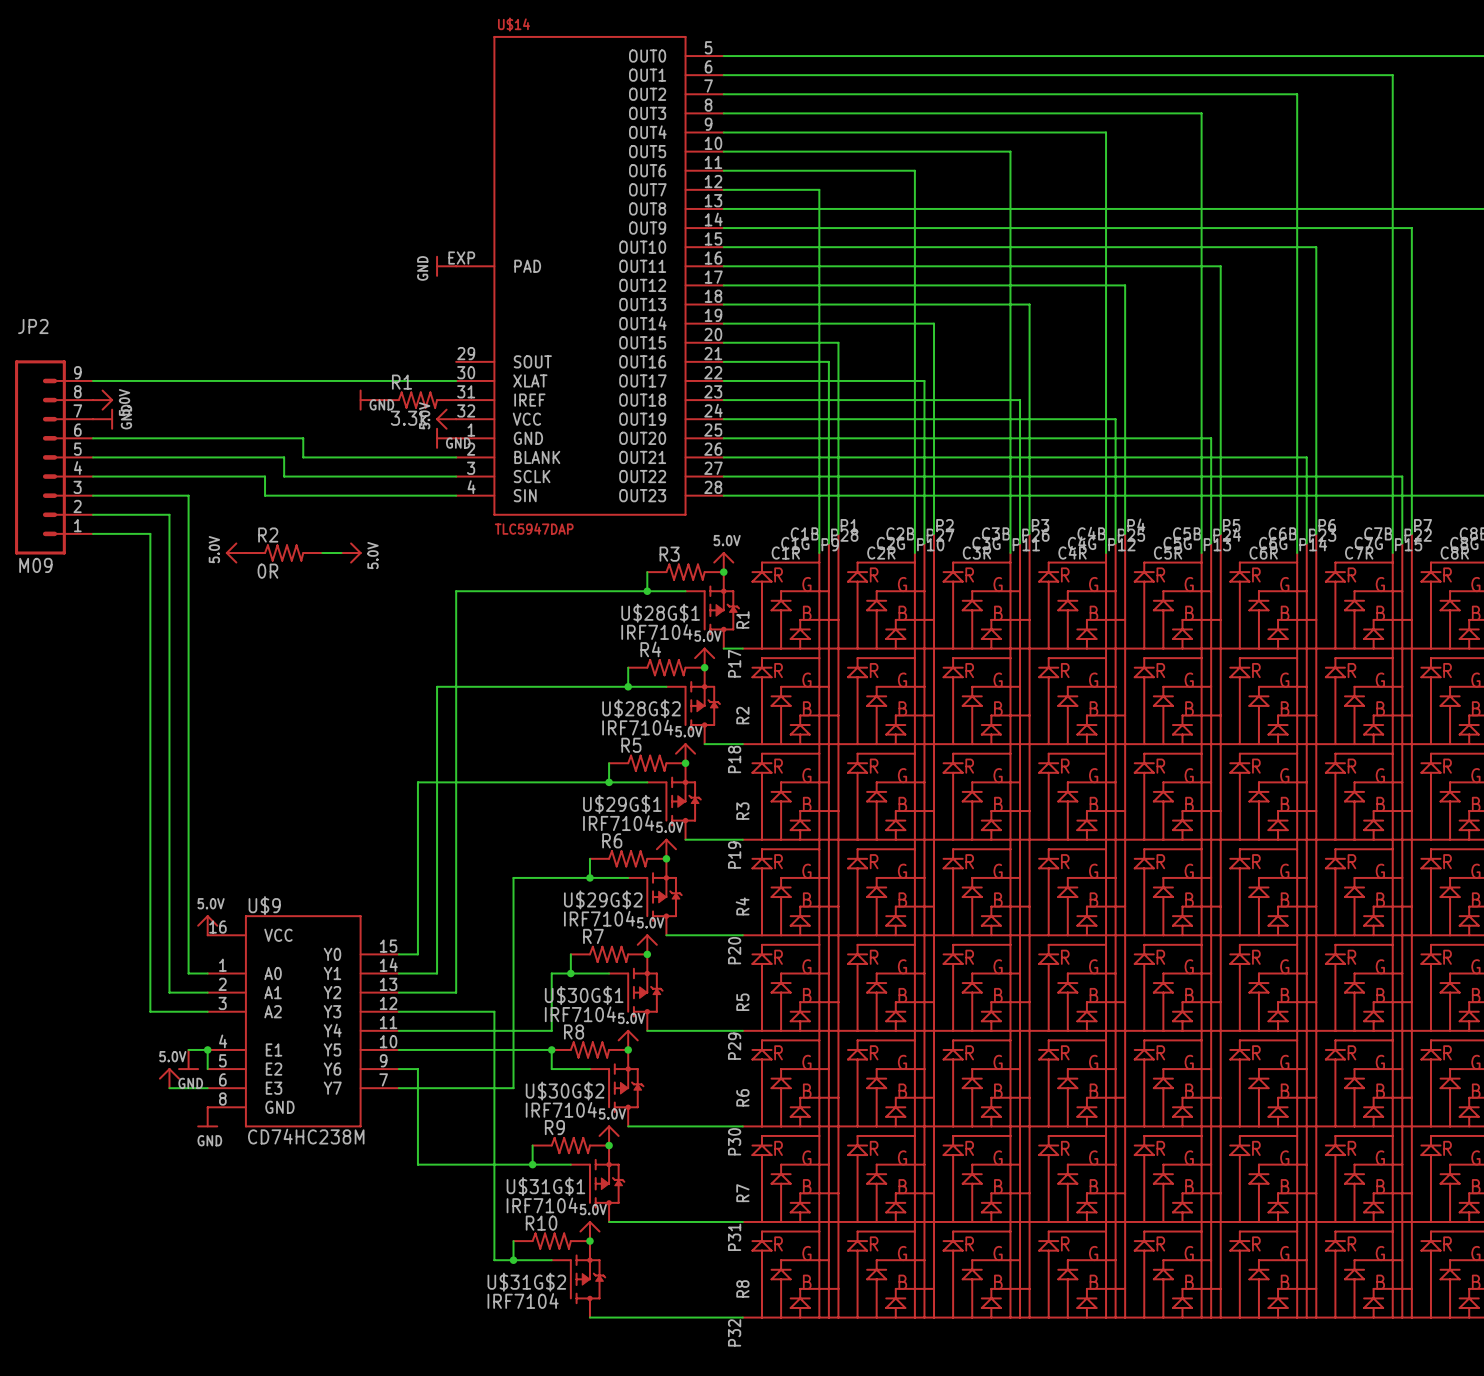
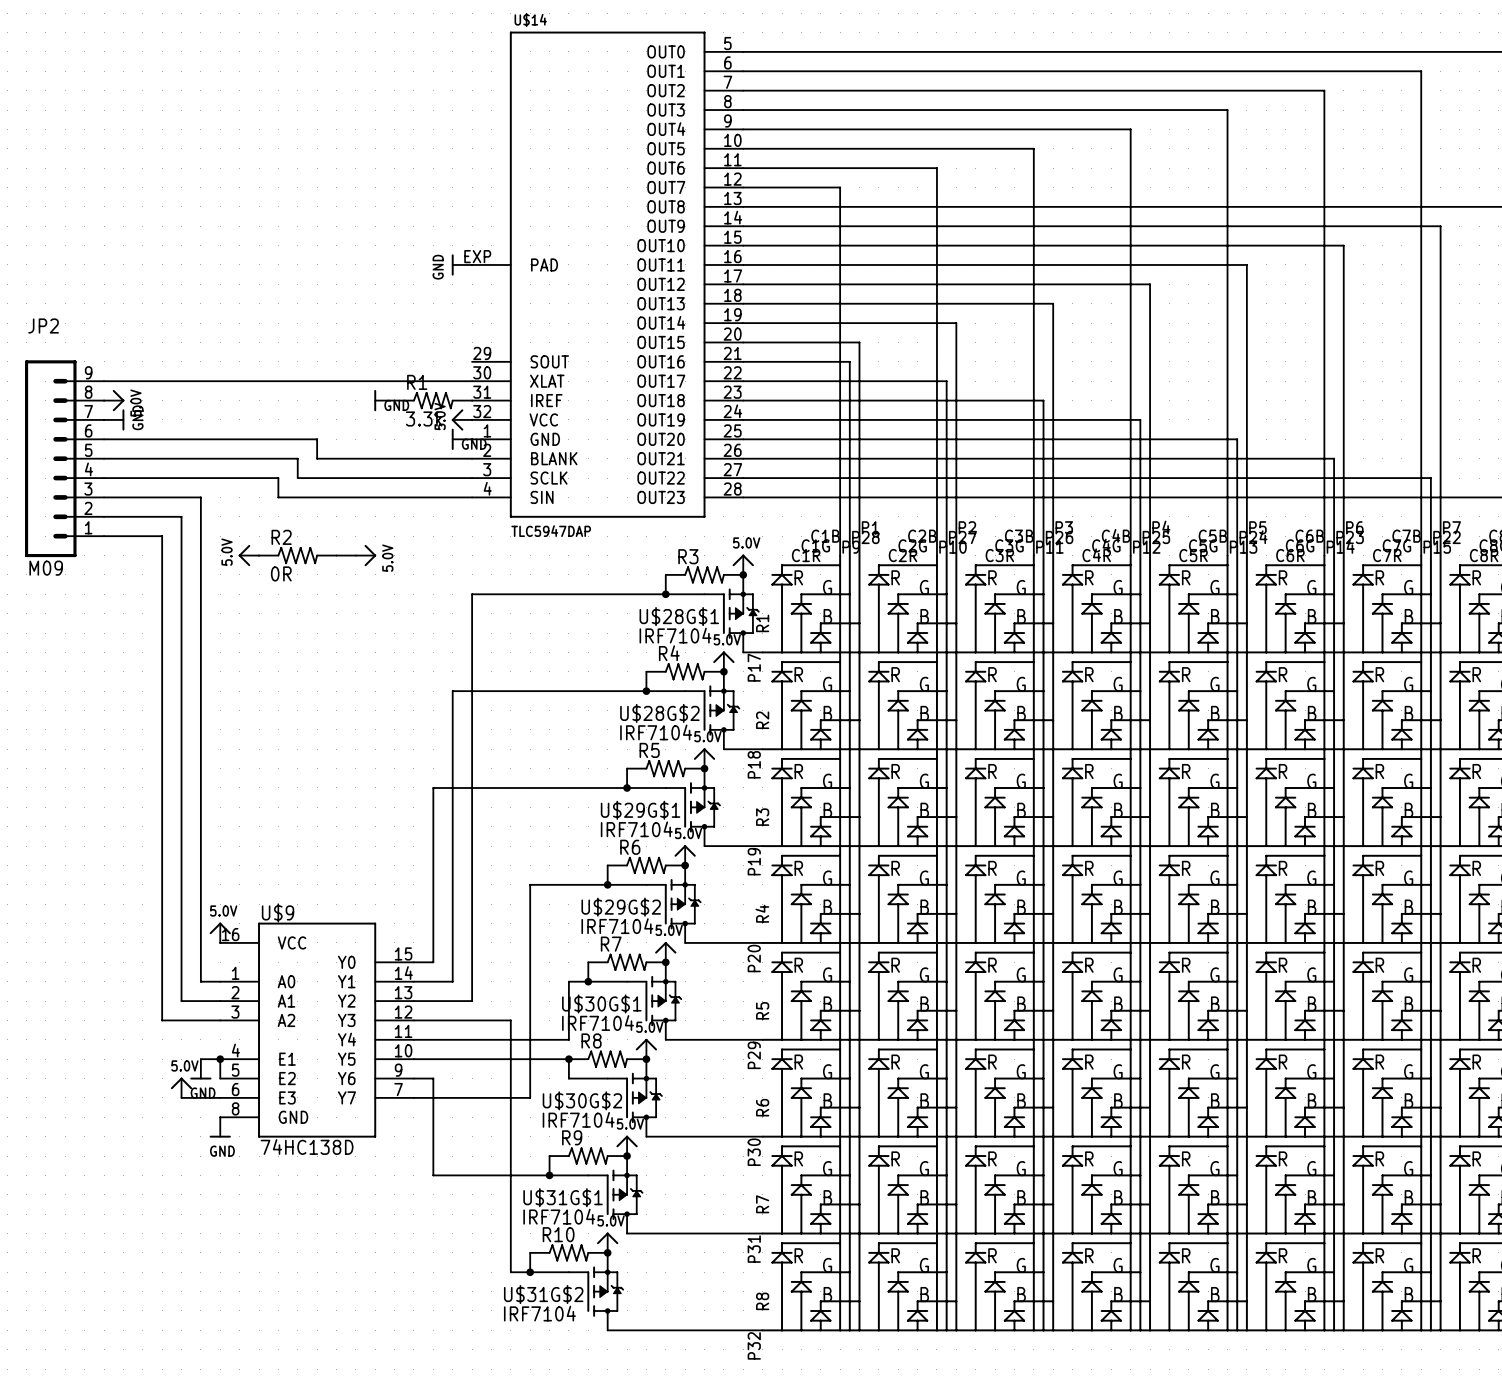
U$9 value: CD74HC238M (306, 1136) -> 74HC138D (307, 1146)

